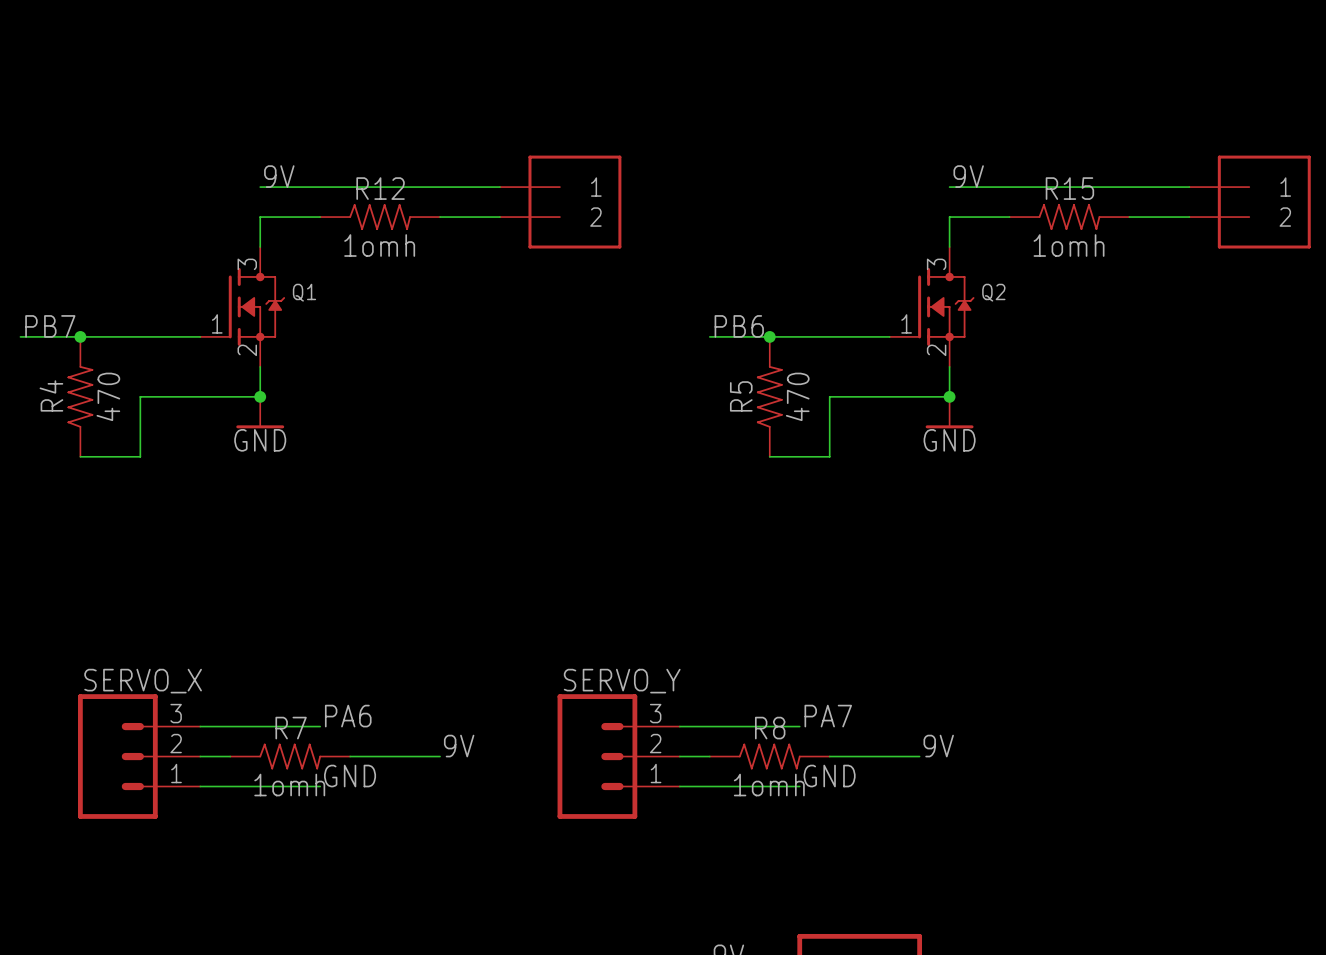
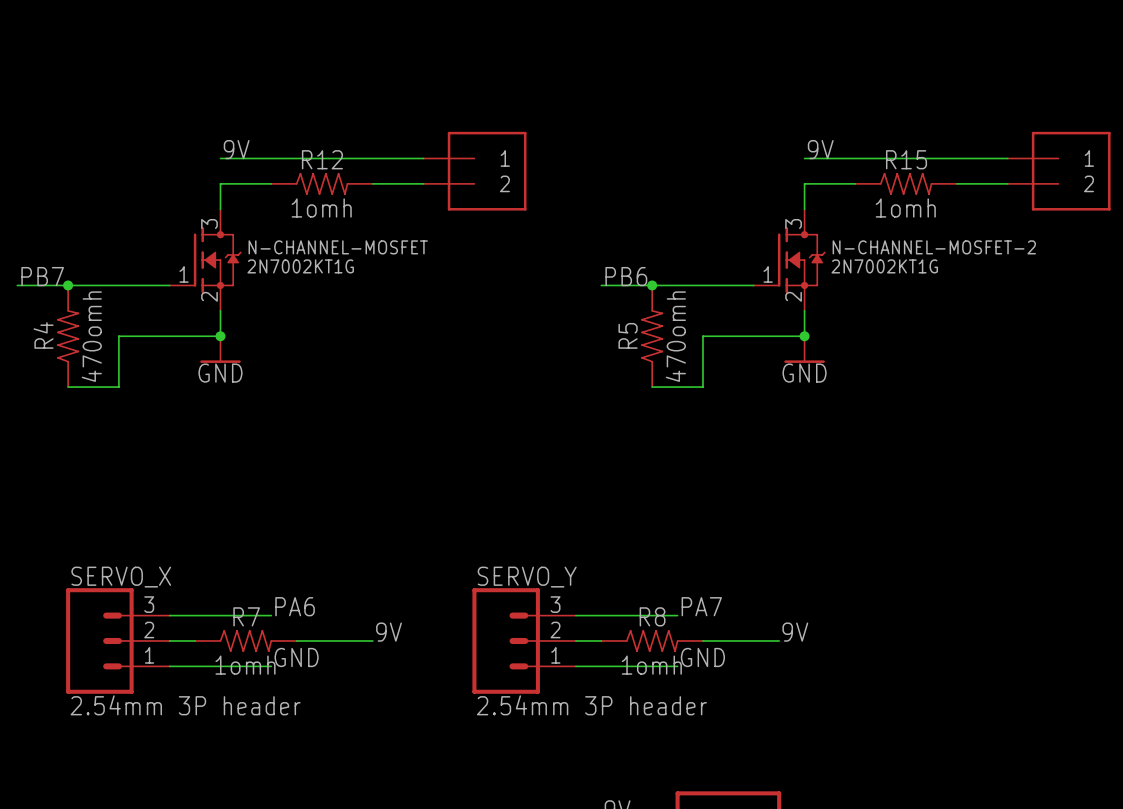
Q1 name: Q1 (304, 292) -> N-CHANNEL-MOSFET (338, 247)
Q2 name: Q2 (993, 292) -> N-CHANNEL-MOSFET-2 (934, 247)
Q1 value: none -> 2N7002KT1G (300, 266)
Q2 value: none -> 2N7002KT1G (884, 266)
R4 value: 470 (108, 396) -> 470omh (91, 336)
R5 value: 470 (797, 396) -> 470omh (675, 336)
SERVO_X value: none -> 2.54mm 3P header (185, 705)
SERVO_Y value: none -> 2.54mm 3P header (591, 705)

